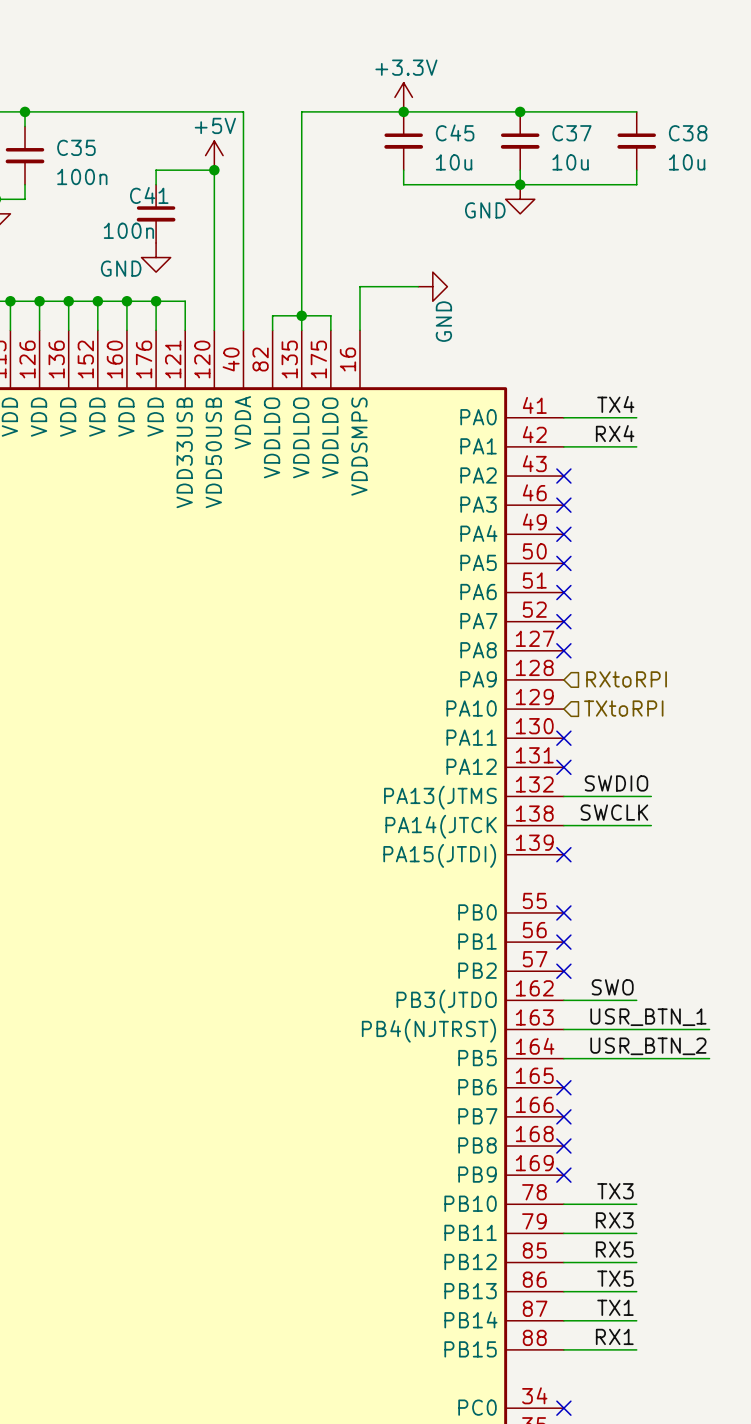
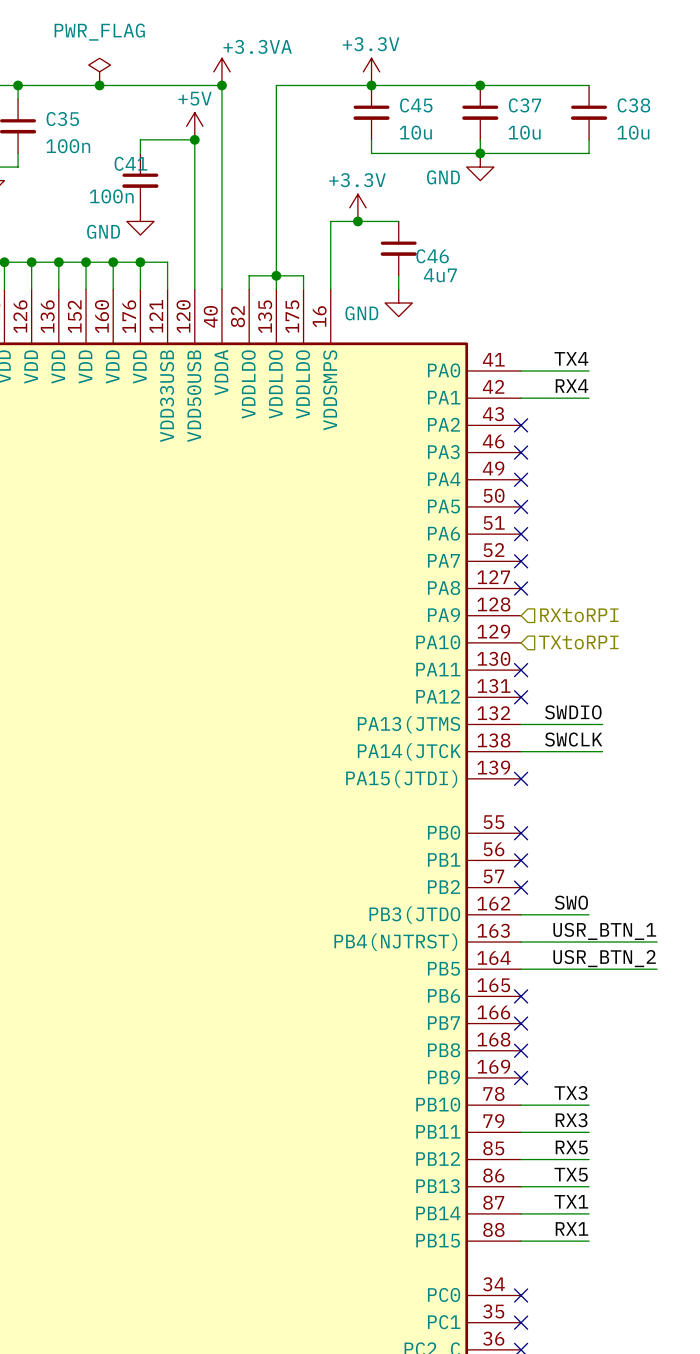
power symbol: none -> PWR_FLAG (99, 71)
power symbol: none -> +3.3VA (221, 71)
junction: none -> (99, 85)
junction: none -> (221, 85)
power symbol: none -> +3.3V (357, 207)
junction: none -> (357, 221)
wire: (359, 286) (418, 286) -> (330, 248) (330, 221) (398, 221)
power symbol rotation: 0° (432, 286) -> 90° clockwise (398, 303)
power symbol position: GND (432, 286) -> GND (398, 303)
C46: none -> 4u7 (398, 248)
wire: none -> (398, 275) (398, 289)

